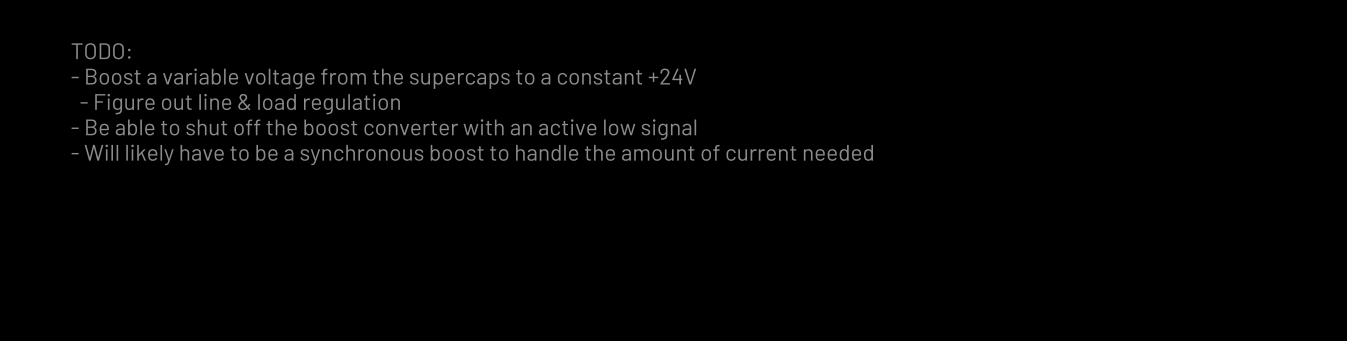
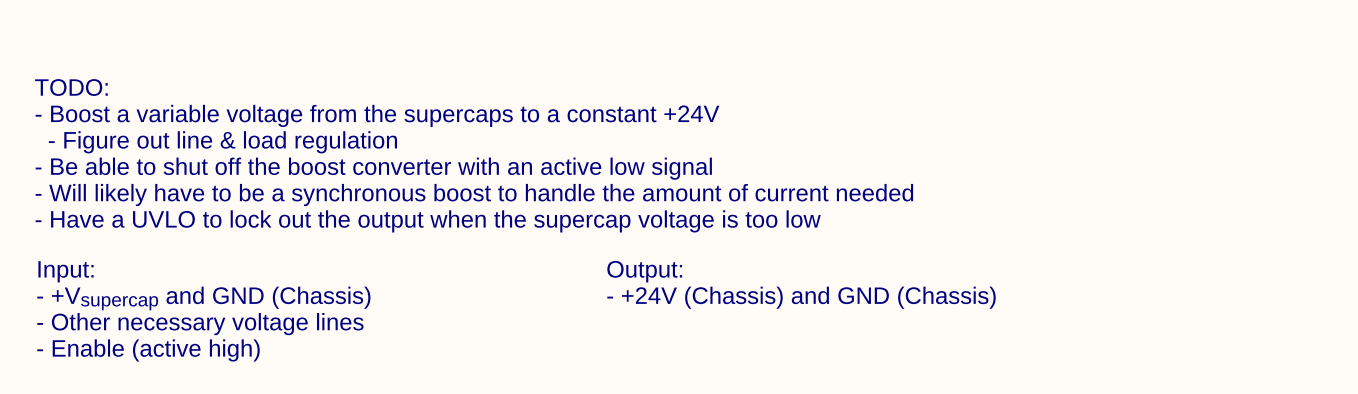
text: none -> - Have a UVLO to lock out the output when the supercap voltage is too low (428, 221)
text: none -> Input: (66, 271)
text: none -> Output: (644, 271)
text: none -> - +24V (Chassis) and GND (Chassis) (801, 297)
text: none -> - +Vsupercap and GND (Chassis) (203, 298)
text: none -> - Other necessary voltage lines (200, 324)
text: none -> - Enable (active high) (148, 350)

